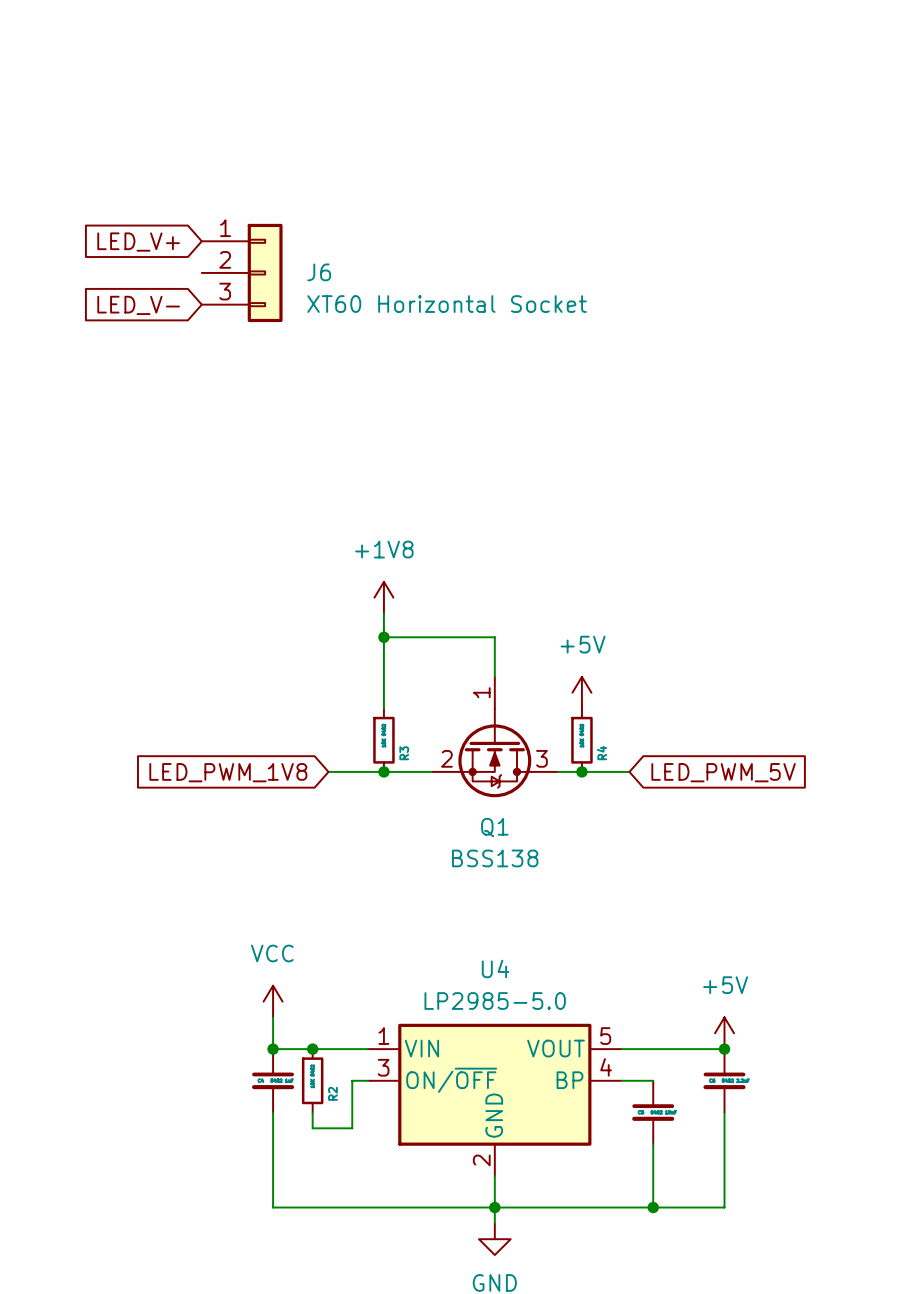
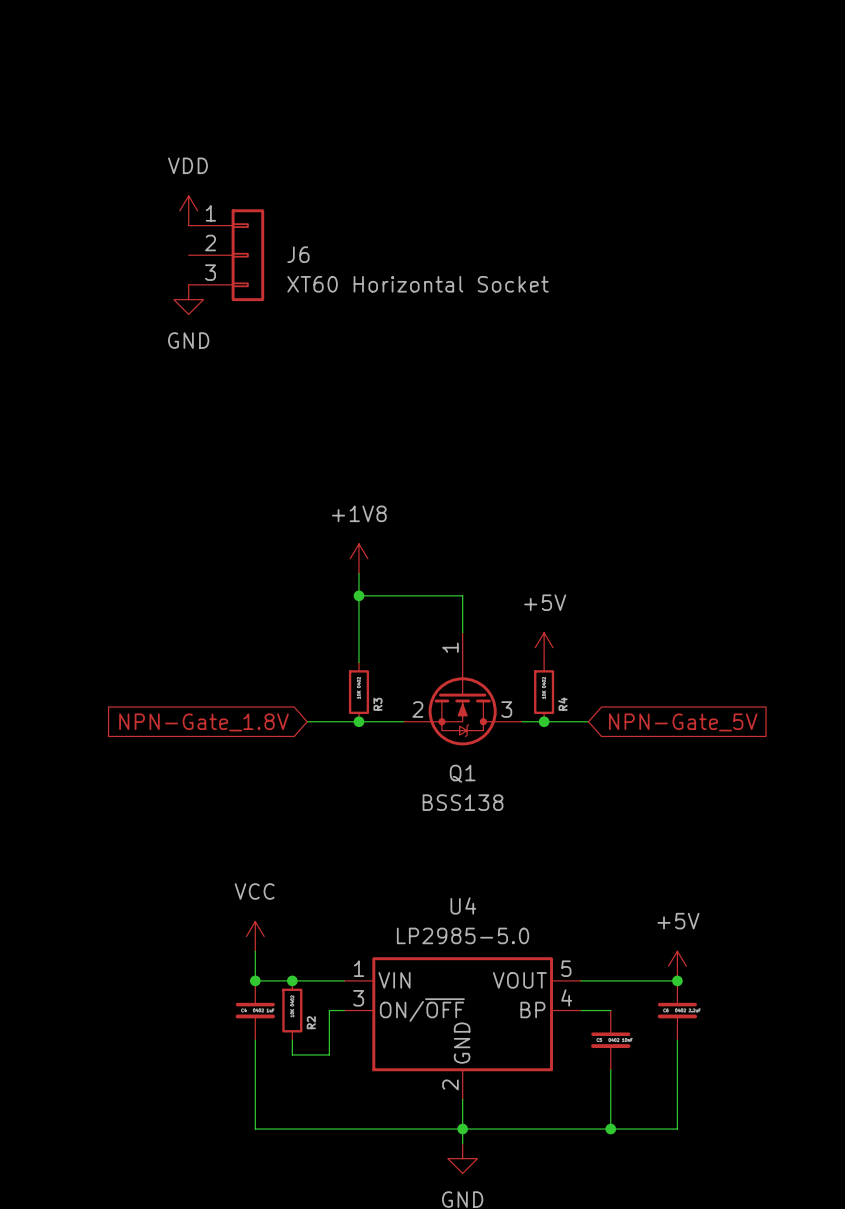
power symbol: none -> VDD (188, 210)
global label: LED_V+ (138, 242) -> none
global label: LED_V- (138, 305) -> none
power symbol: none -> GND (188, 299)
global label: LED_PWM_1V8 (228, 772) -> NPN-Gate_1.8V (203, 722)
global label: LED_PWM_5V (723, 772) -> NPN-Gate_5V (683, 722)

